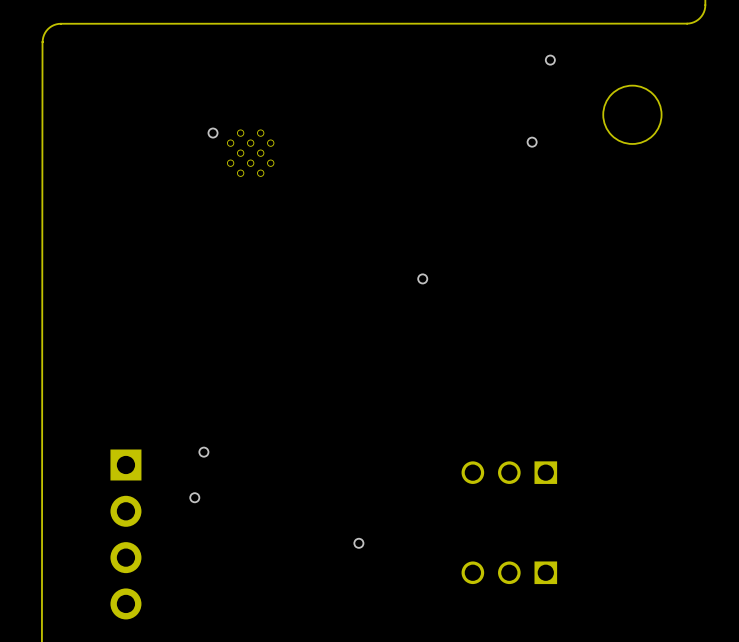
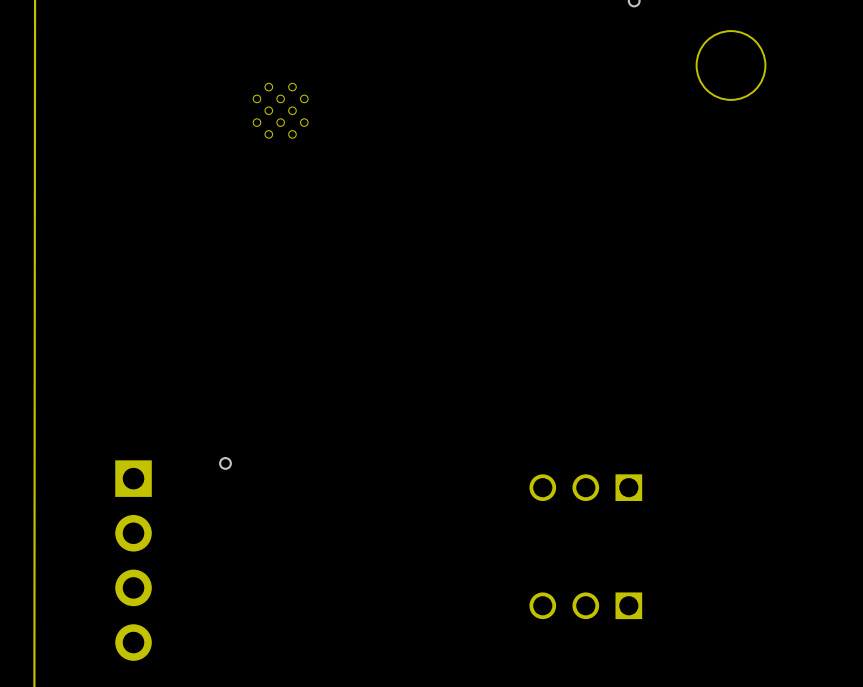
via: (213, 133) -> none
via: (532, 142) -> none
via: (422, 278) -> none
via: (194, 497) -> none
via: (358, 543) -> none

